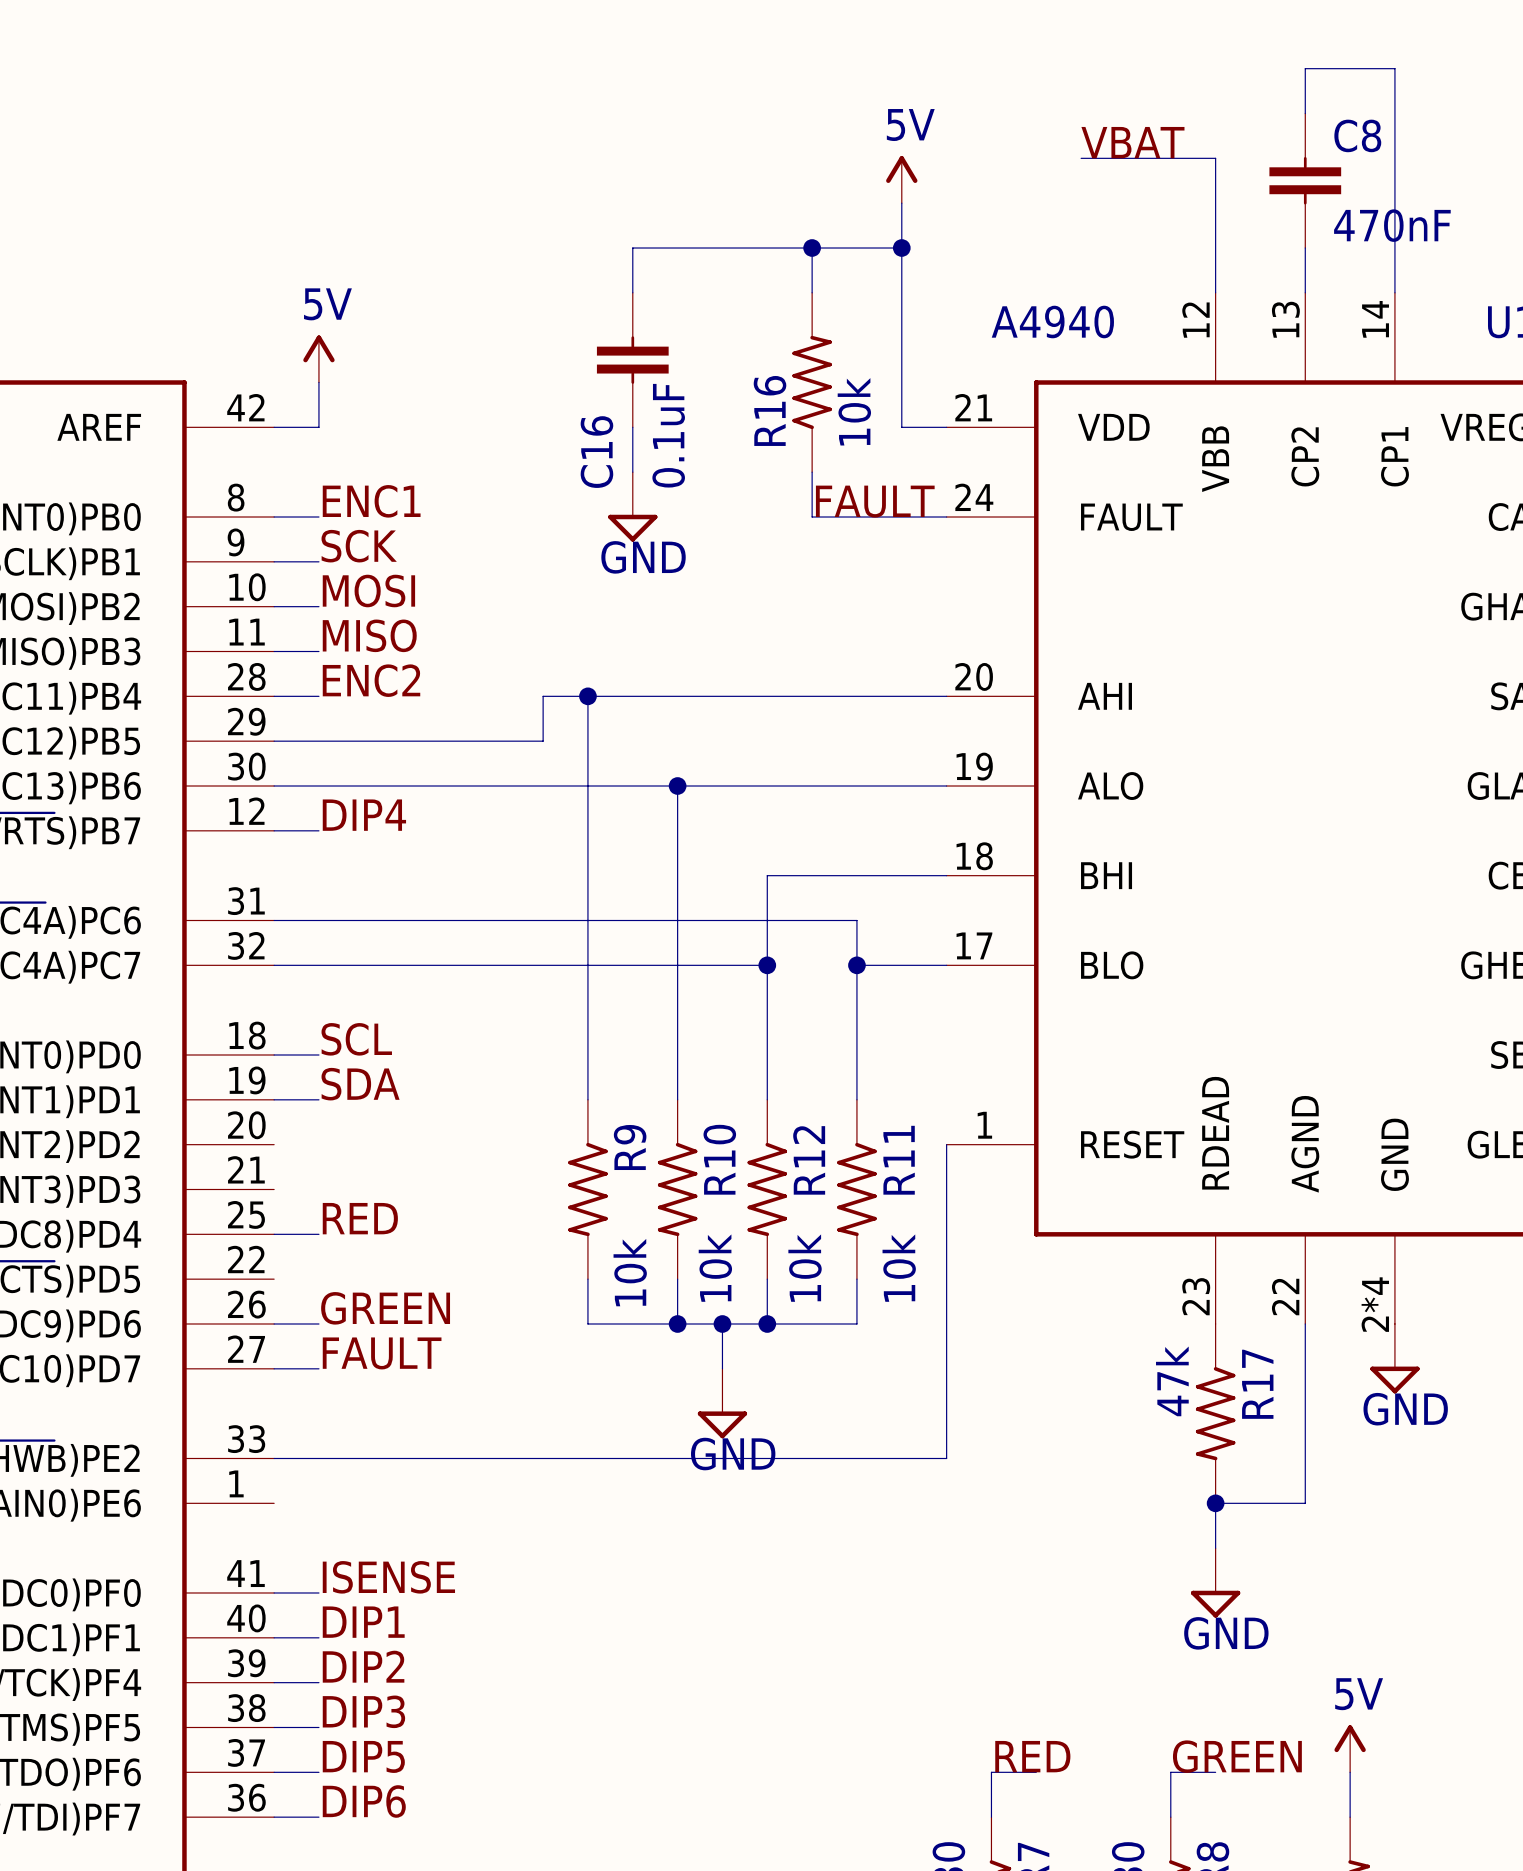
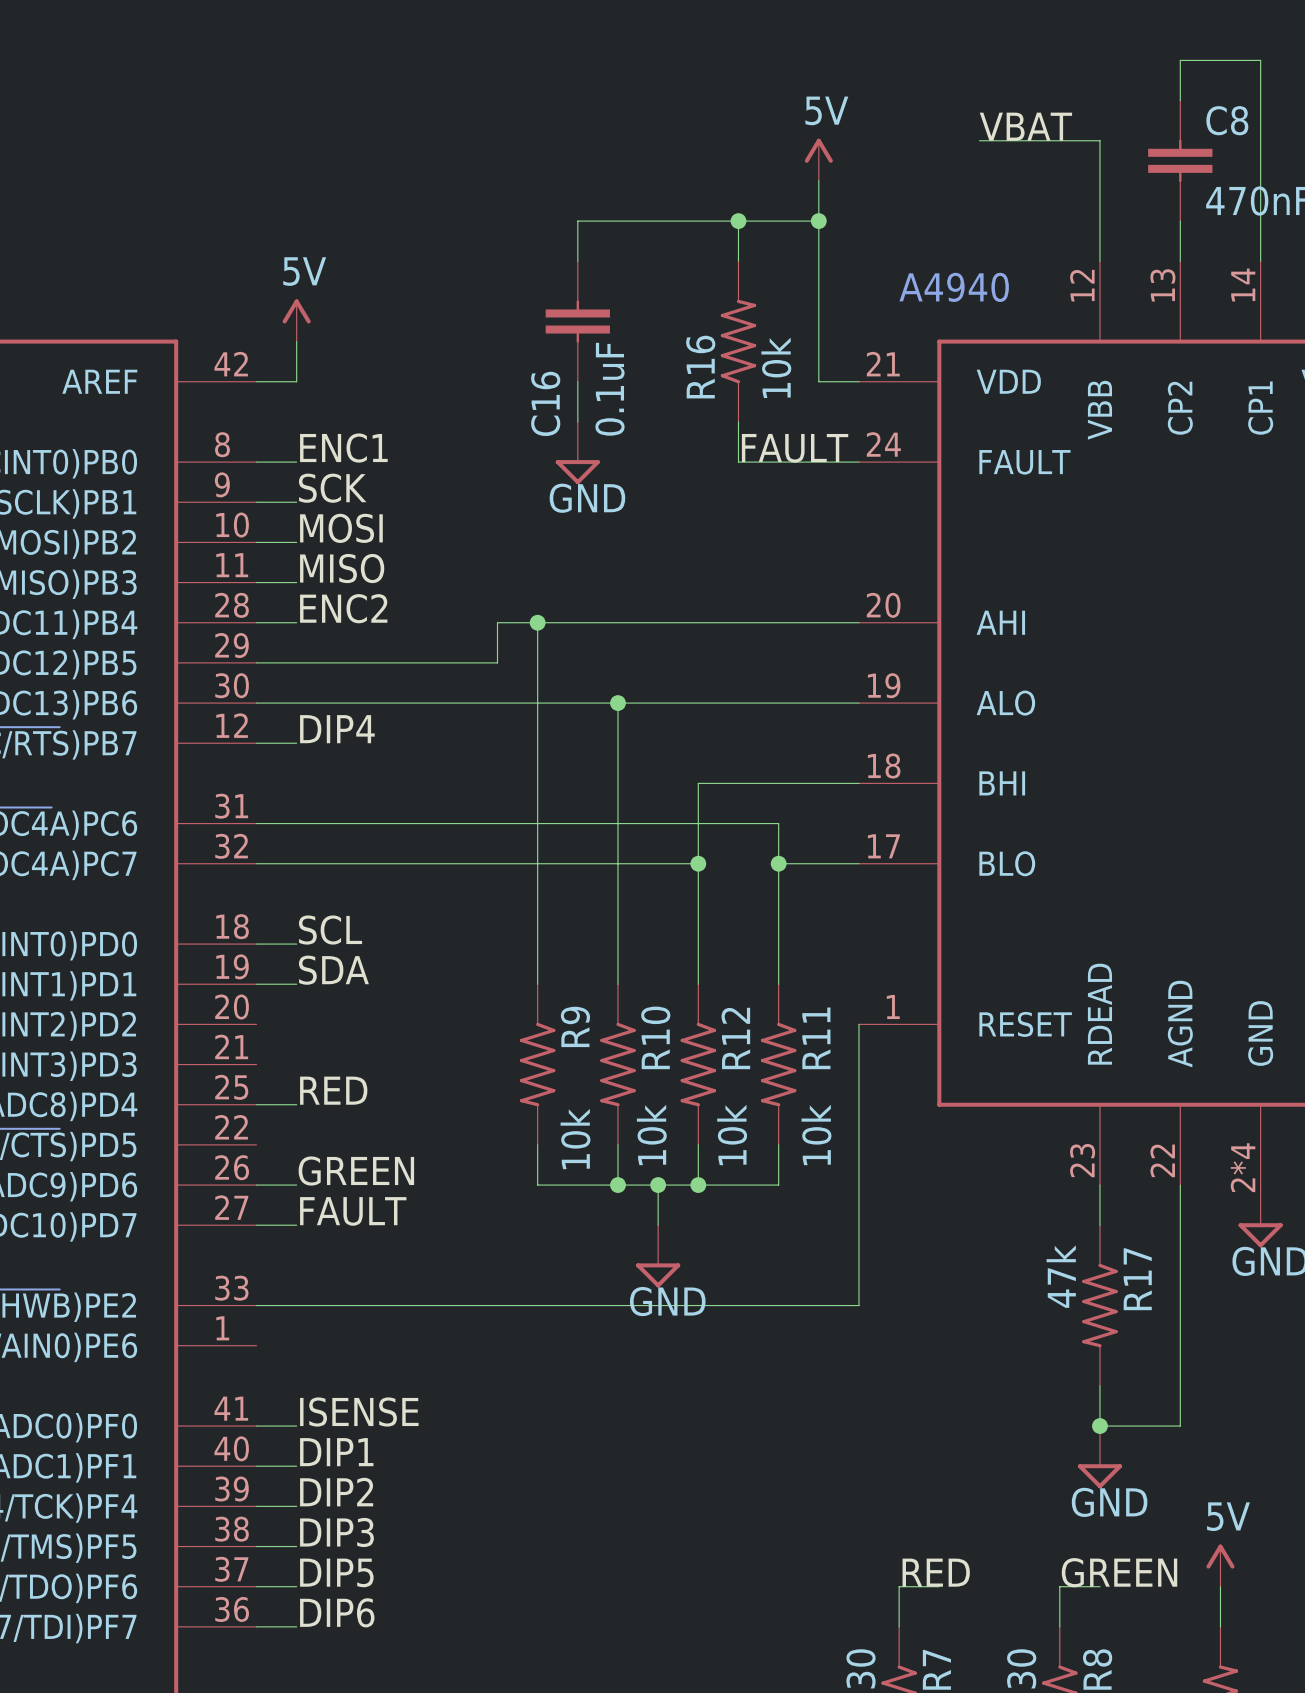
R17 position: (1215, 1413) -> (1099, 1305)
junction position: (1215, 1503) -> (1099, 1426)
wire: (1305, 1503) (1215, 1503) (1215, 1548) -> (1180, 1345) (1180, 1426) (1099, 1426) (1099, 1385)
power symbol position: GND (1215, 1582) -> GND (1099, 1457)

